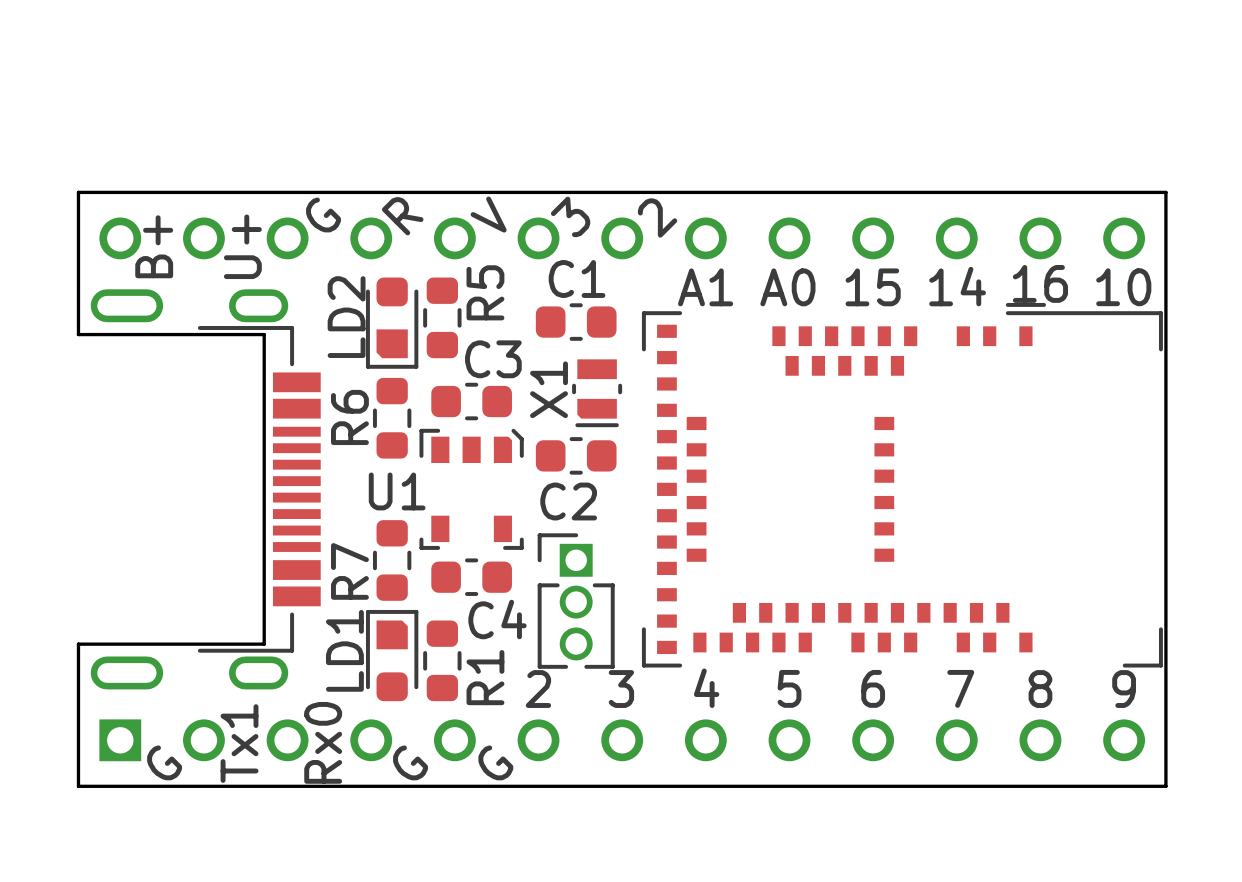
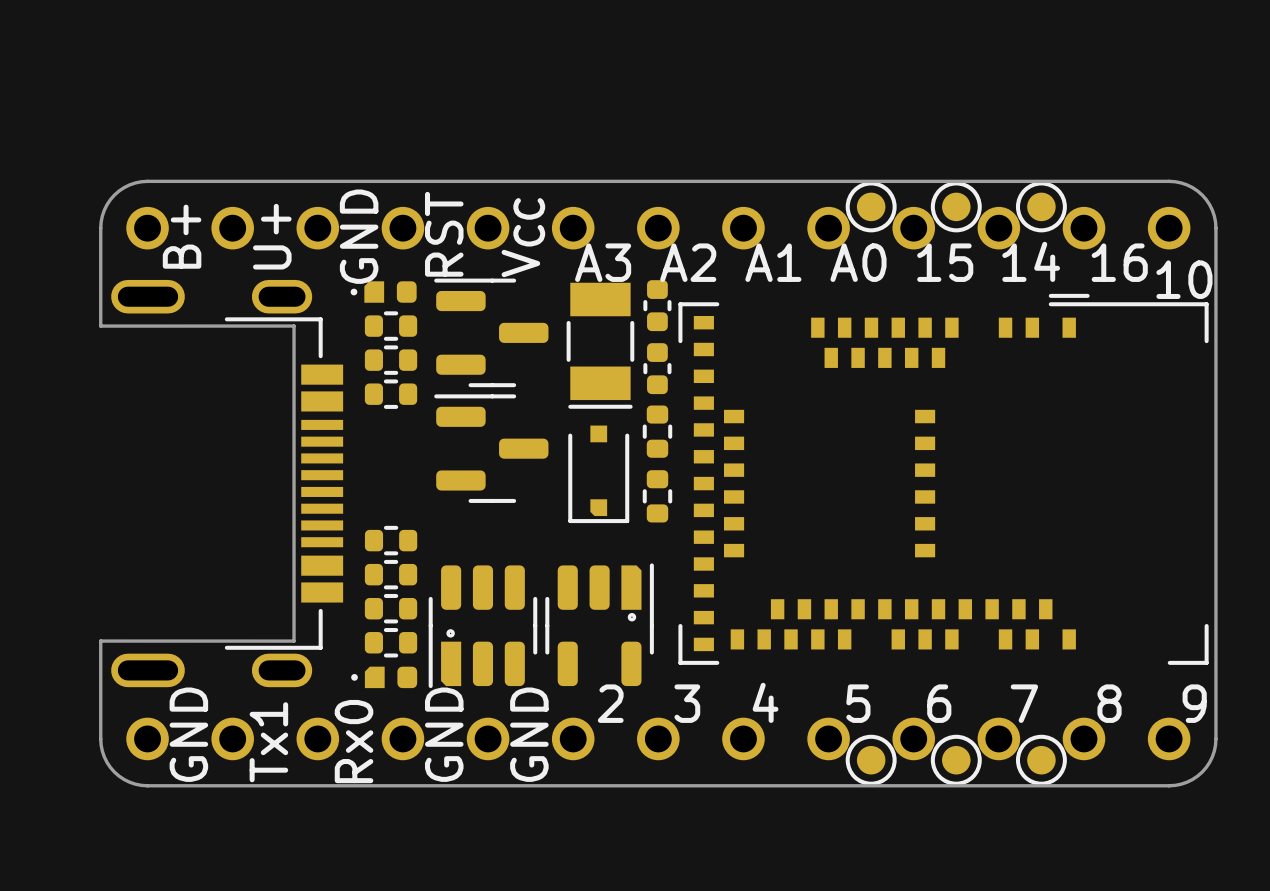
board edge: (120, 192) (78, 192) (78, 334) (264, 334) -> (147, 181) (135, 182) (119, 191) (107, 204) (102, 216) (100, 326) (294, 326)
board edge: (1124, 192) (1165, 192) (1165, 786) (1124, 786) -> (1169, 181) (1187, 184) (1202, 195) (1212, 210) (1215, 228) (1215, 745) (1209, 762) (1197, 776) (1181, 784) (1169, 785)
text: G (323, 214) -> GND (359, 236)
text: V (488, 214) -> VCC (523, 237)
text: R (402, 216) -> RST (444, 234)
text: 3 (570, 216) -> A3 (603, 262)
part: none -> (871, 206)
part: none -> (956, 206)
part: none -> (1041, 206)
text: 2 (657, 218) -> A2 (688, 262)
text position: 16 (1040, 283) -> 16 (1119, 262)
text position: 14 (957, 286) -> 14 (1031, 261)
text position: A1 (705, 287) -> A1 (773, 262)
text position: A0 (787, 287) -> A0 (858, 262)
text position: 15 (873, 287) -> 15 (945, 262)
text position: 10 (1123, 287) -> 10 (1184, 279)
part footprint: [90, 289, 321, 690] -> [111, 279, 344, 688]
part: none -> (383, 292)
part: none -> (657, 305)
R5: (442, 317) -> none
C1: (576, 322) -> none
LD2: (392, 323) -> none
part: none -> (391, 326)
part: none -> (491, 332)
part: none -> (600, 345)
part: none -> (391, 360)
part: none -> (657, 368)
X1: (597, 393) -> none
part: none -> (391, 394)
C3: (471, 401) -> none
R6: (392, 418) -> none
part: none -> (657, 431)
part: none -> (491, 448)
C2: (576, 455) -> none
part: none -> (598, 474)
U1: (474, 486) -> none
part: none -> (657, 496)
part footprint: [537, 533, 615, 669] -> [545, 563, 654, 687]
part: none -> (391, 540)
R7: (392, 560) -> none
C4: (471, 577) -> none
part: none -> (391, 574)
part: none -> (391, 608)
drawing: none -> [627, 613, 637, 622]
part: none -> (482, 626)
drawing: none -> [446, 629, 455, 638]
board edge: (264, 644) (78, 644) (78, 786) (120, 786) -> (294, 641) (100, 641) (102, 751) (107, 762) (119, 776) (129, 782) (147, 785)
part: none -> (391, 642)
LD1: (392, 655) -> none
R1: (442, 660) -> none
part: none -> (384, 677)
text position: 4 (706, 688) -> 4 (765, 702)
text position: 5 (789, 688) -> 5 (858, 703)
text position: 6 (873, 688) -> 6 (939, 703)
text position: 7 (960, 688) -> 7 (1024, 703)
text position: 2 (538, 689) -> 2 (610, 703)
text position: 3 (621, 689) -> 3 (687, 703)
text position: 8 (1040, 689) -> 8 (1109, 703)
text position: 9 (1124, 689) -> 9 (1194, 703)
part footprint: [99, 719, 142, 762] -> [126, 717, 169, 761]
part: none -> (871, 760)
part: none -> (956, 760)
part: none -> (1041, 760)
text: G (164, 762) -> GND (188, 734)
text: G (410, 762) -> GND (444, 734)
text: G (495, 762) -> GND (529, 734)

